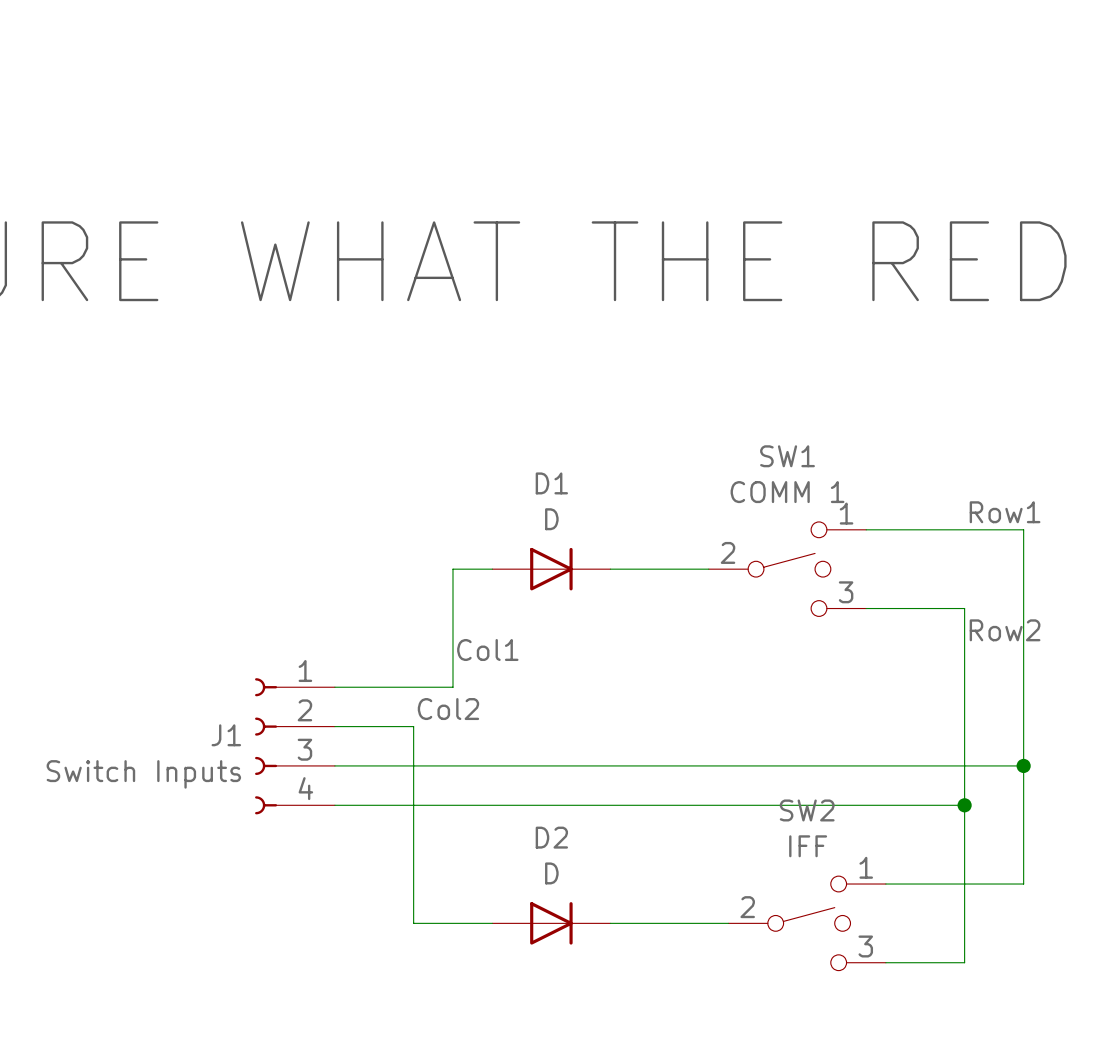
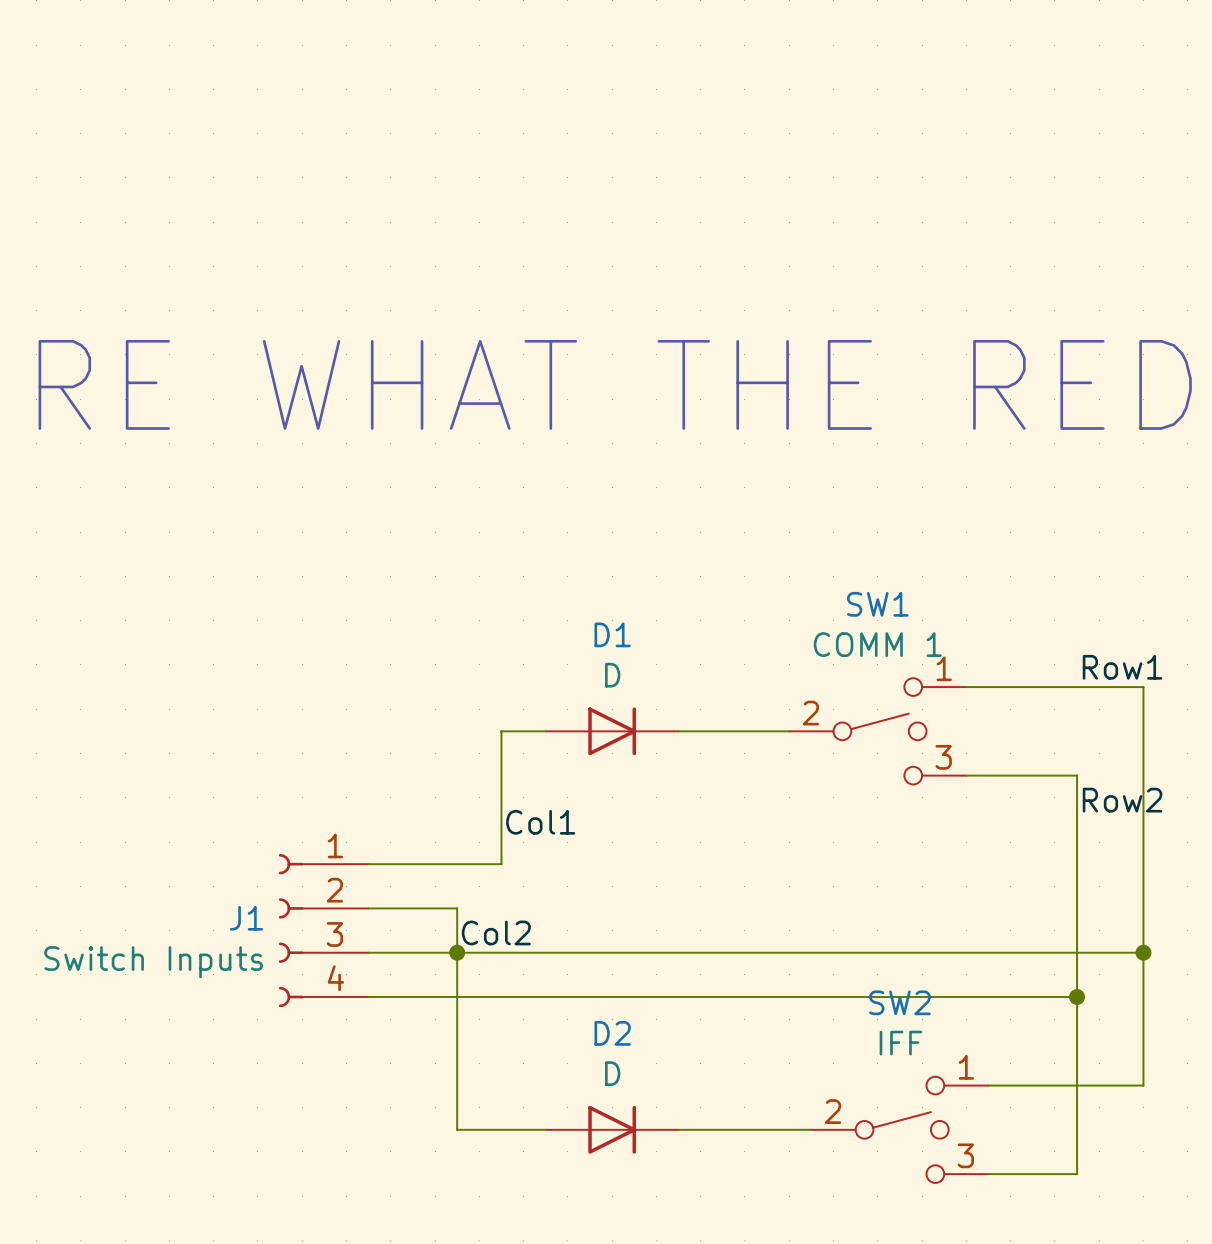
label position: Col2 (448, 709) -> Col2 (496, 932)
junction: none -> (457, 952)

